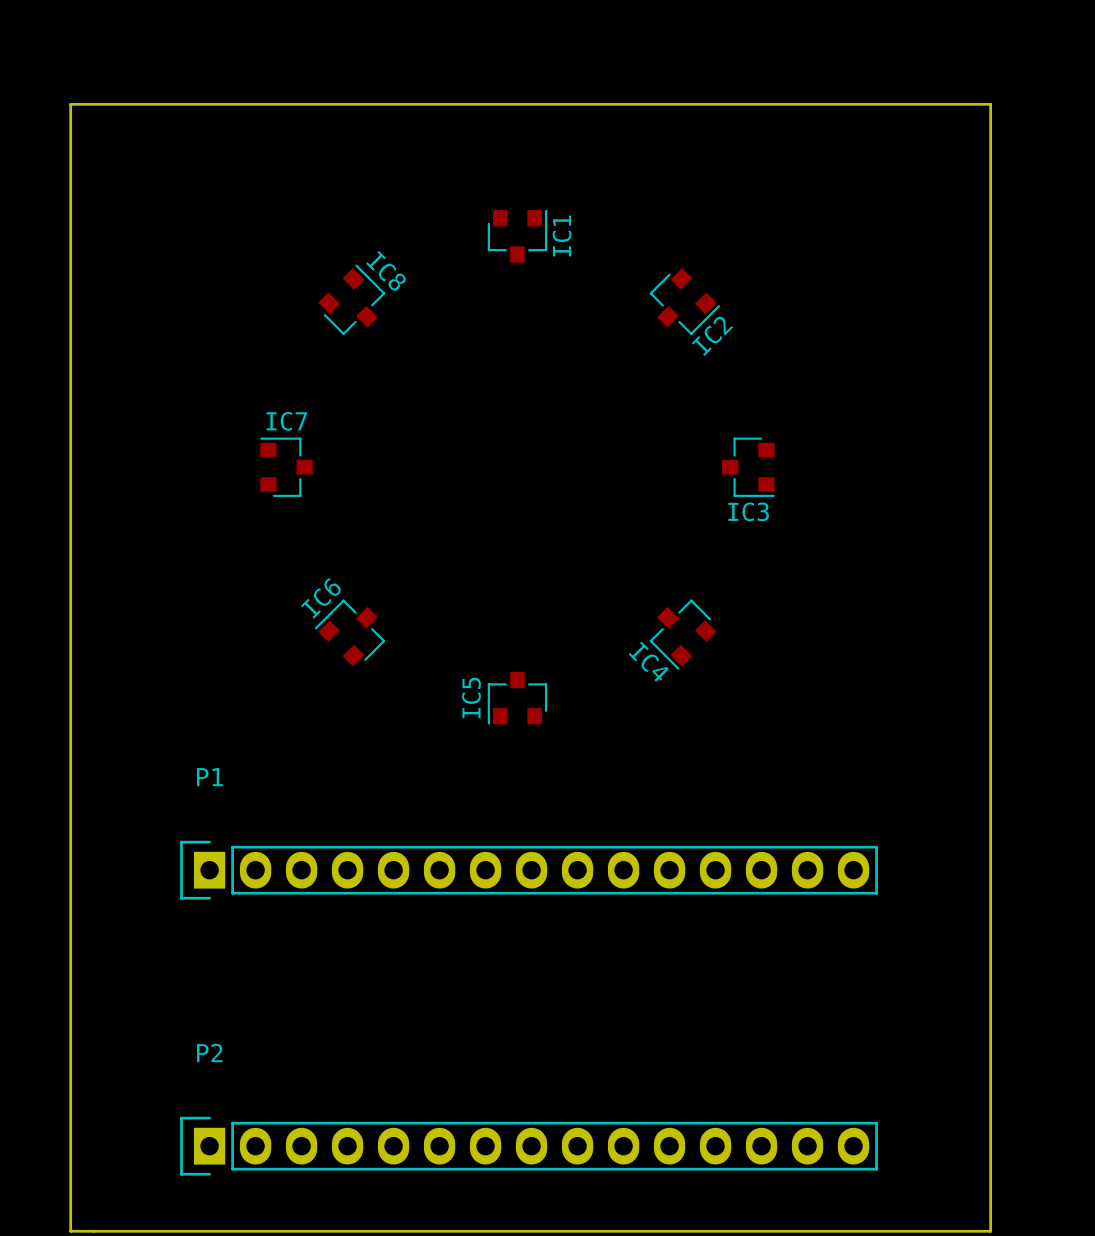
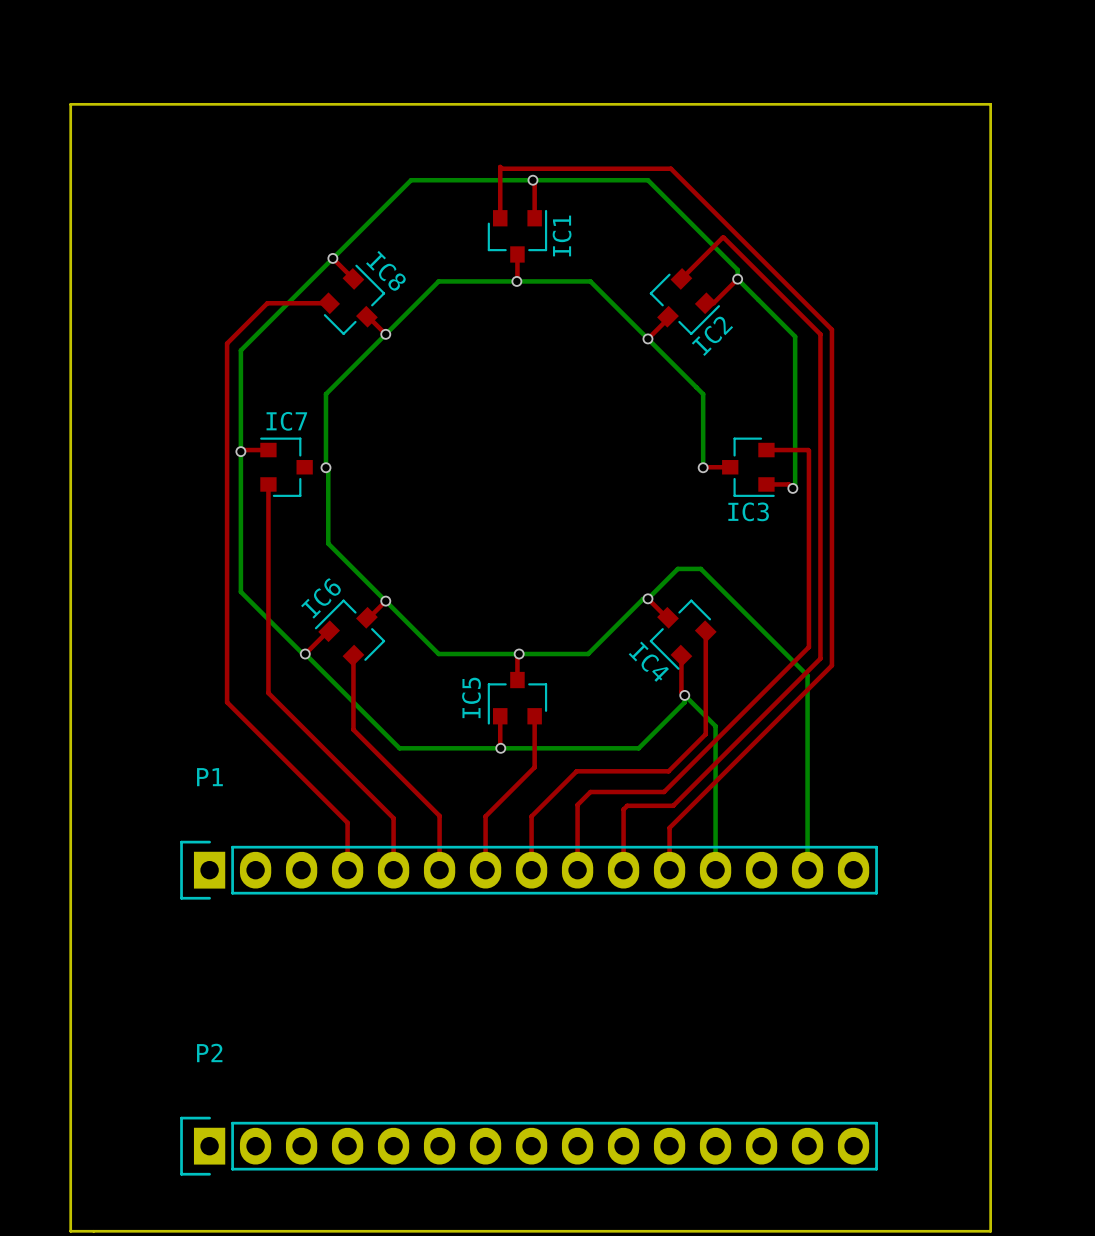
top track: none -> (532, 180) (534, 181) (534, 218)
via: none -> (532, 180)
top track: none -> (500, 218) (500, 166) (502, 168) (670, 168) (831, 329) (831, 665) (669, 827) (669, 870)
top track: none -> (517, 254) (516, 281)
top track: none -> (332, 258) (353, 278)
via: none -> (332, 258)
top track: none -> (681, 278) (723, 237) (820, 334) (820, 658) (673, 805) (627, 805) (623, 809) (623, 870)
top track: none -> (737, 279) (713, 303) (705, 303)
via: none -> (737, 279)
via: none -> (516, 281)
top track: none -> (329, 303) (267, 303) (227, 343) (227, 702) (347, 822) (347, 870)
top track: none -> (366, 316) (385, 334)
top track: none -> (667, 316) (647, 338)
via: none -> (385, 334)
via: none -> (647, 338)
top track: none -> (268, 450) (240, 451)
top track: none -> (766, 450) (808, 450) (808, 647) (664, 792) (590, 792) (577, 804) (577, 870)
via: none -> (240, 451)
via: none -> (325, 467)
bottom track: none -> (703, 467) (703, 394) (590, 281) (438, 281) (325, 394) (328, 543) (438, 654) (588, 654) (643, 598) (647, 598) (677, 568) (700, 568) (807, 675) (807, 870)
via: none -> (703, 467)
top track: none -> (730, 467) (703, 467)
top track: none -> (268, 484) (268, 693) (393, 818) (393, 870)
top track: none -> (766, 484) (788, 484) (792, 488)
bottom track: none -> (792, 488) (795, 486) (795, 336) (737, 279) (737, 269) (647, 180) (411, 180) (240, 350) (240, 591) (399, 748) (638, 748) (684, 702) (684, 695) (715, 726) (715, 870)
via: none -> (792, 488)
top track: none -> (647, 598) (667, 617)
via: none -> (647, 598)
top track: none -> (385, 601) (366, 617)
via: none -> (385, 601)
top track: none -> (329, 631) (305, 654)
top track: none -> (705, 631) (705, 734) (668, 771) (576, 771) (531, 816) (531, 870)
via: none -> (305, 654)
top track: none -> (519, 654) (517, 655) (517, 680)
via: none -> (519, 654)
top track: none -> (353, 655) (353, 729) (439, 815) (439, 870)
top track: none -> (681, 655) (681, 692) (684, 695)
via: none -> (684, 695)
top track: none -> (500, 716) (500, 748)
top track: none -> (534, 716) (534, 767) (485, 816) (485, 870)
via: none -> (500, 748)

